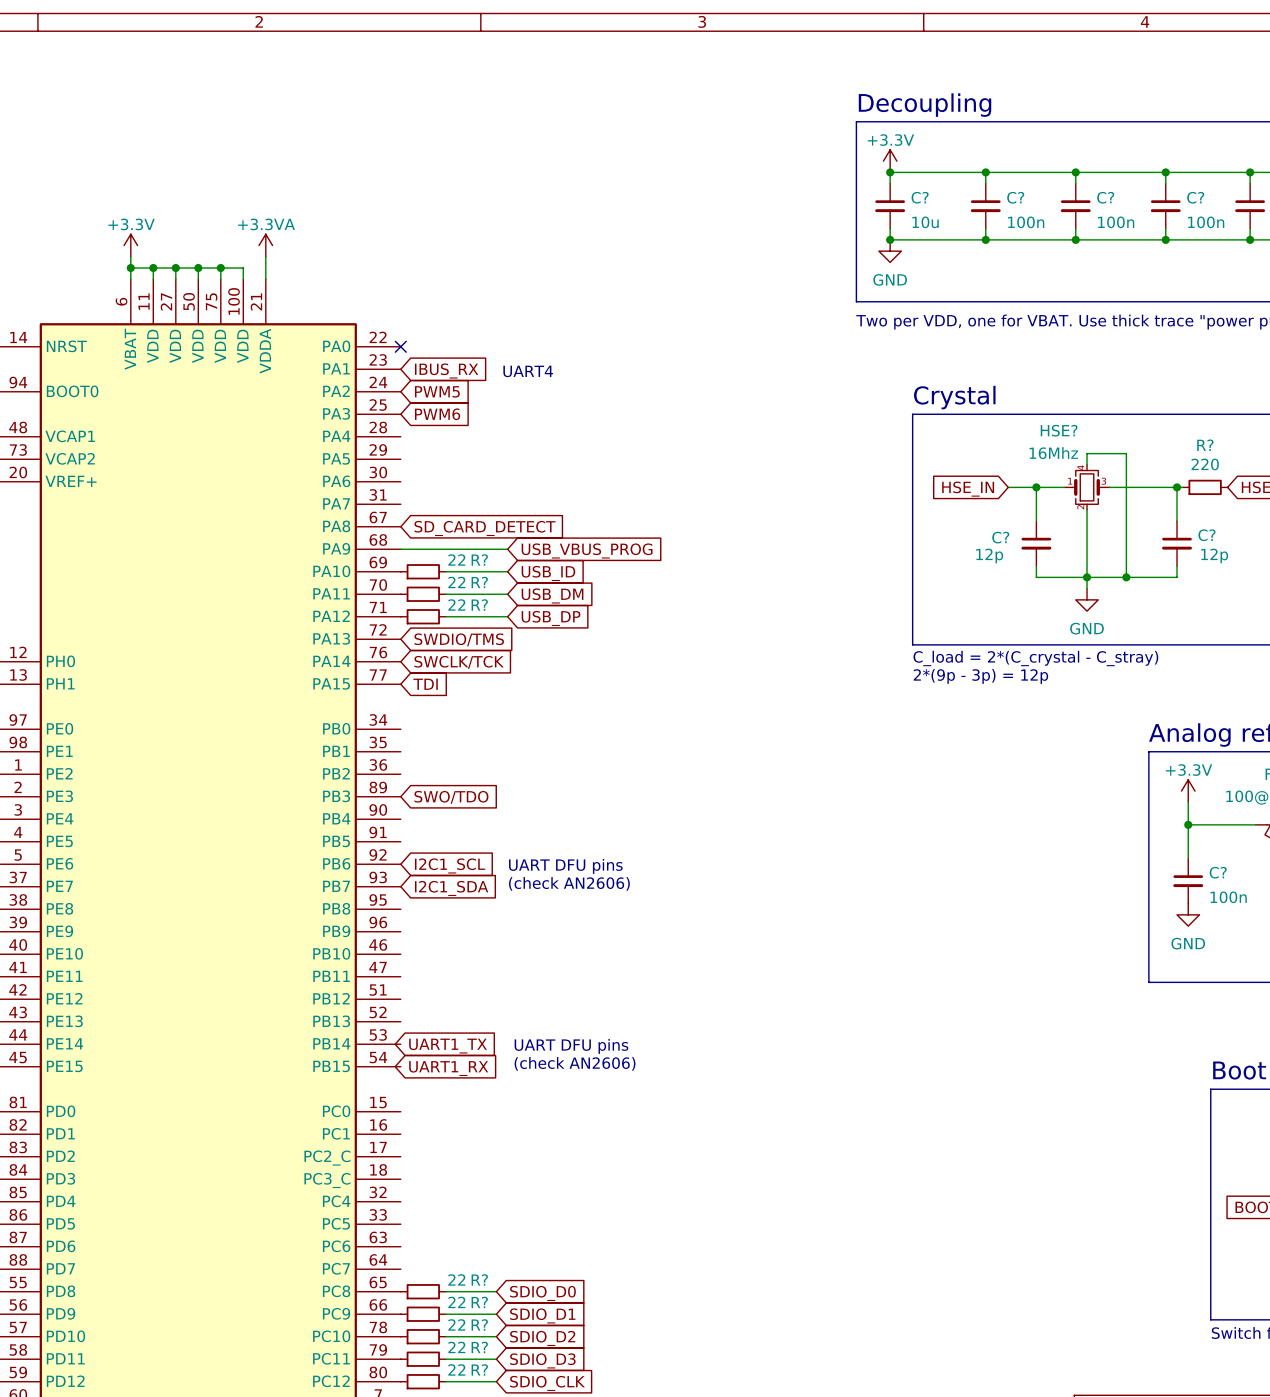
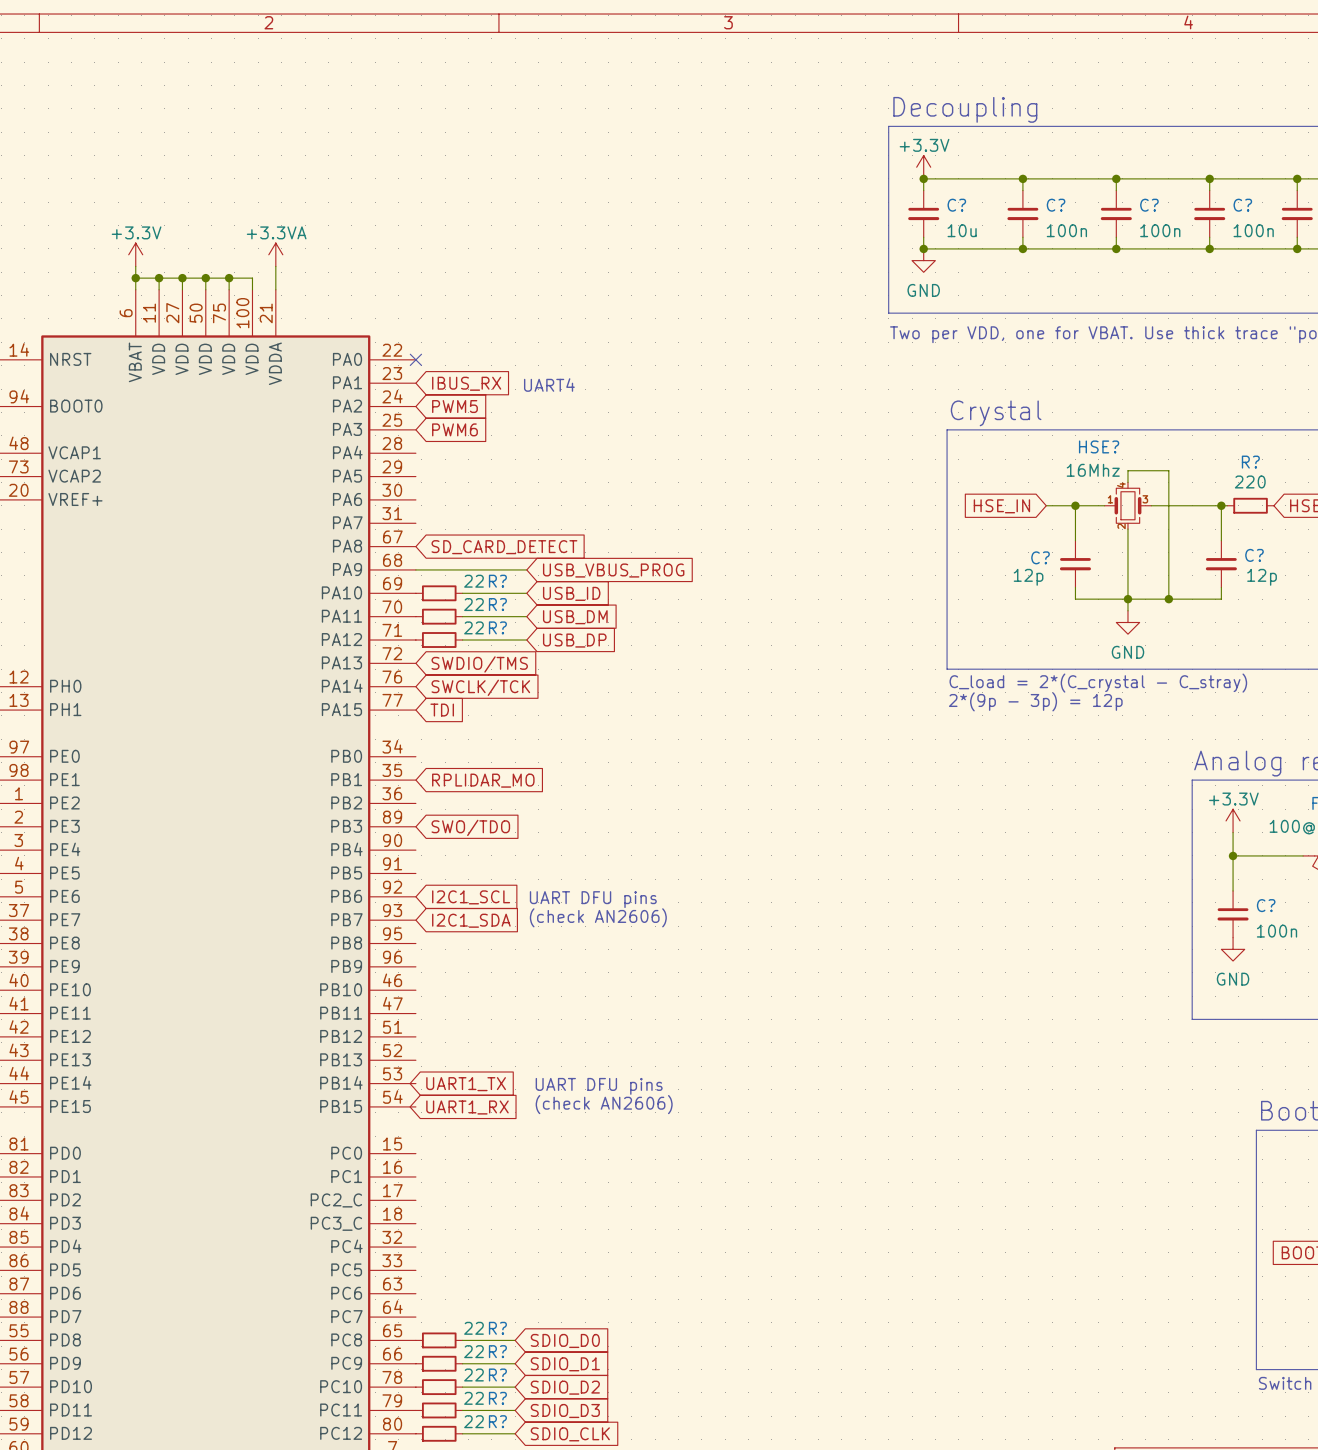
global label: none -> RPLIDAR_MO (483, 780)

